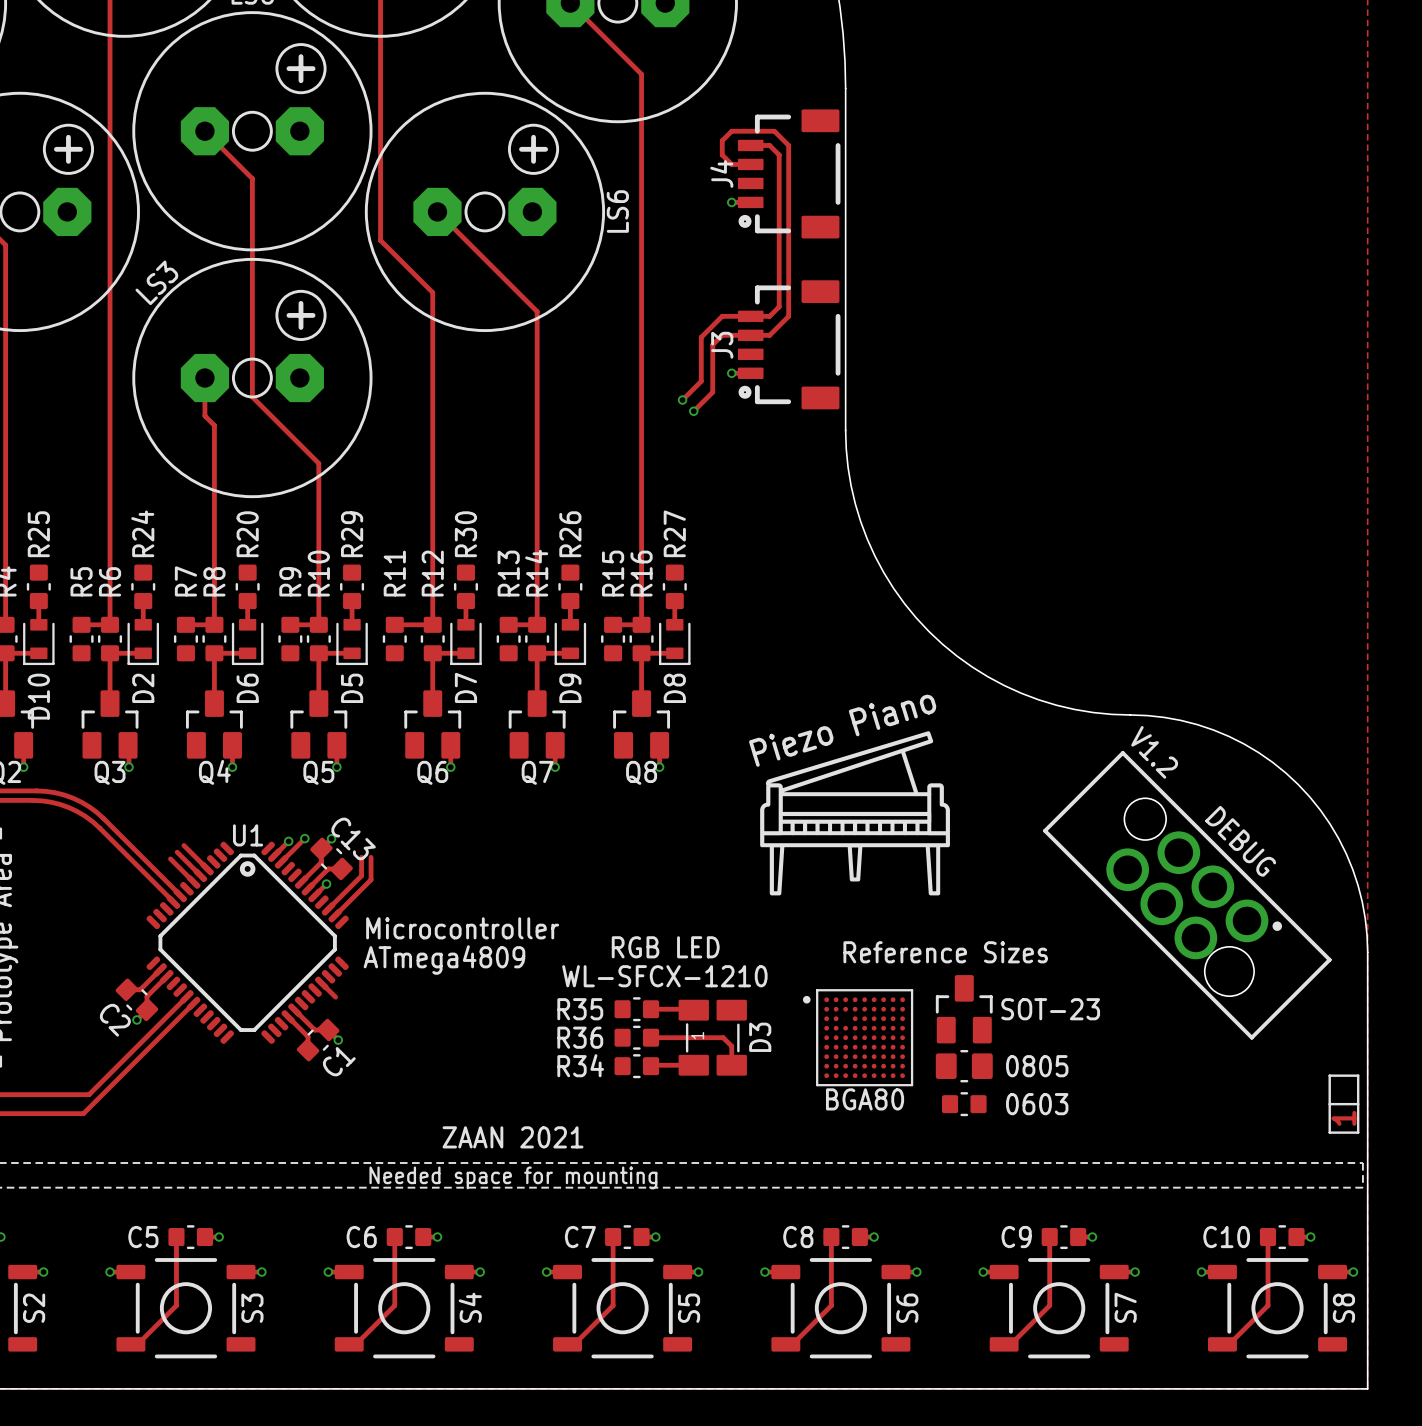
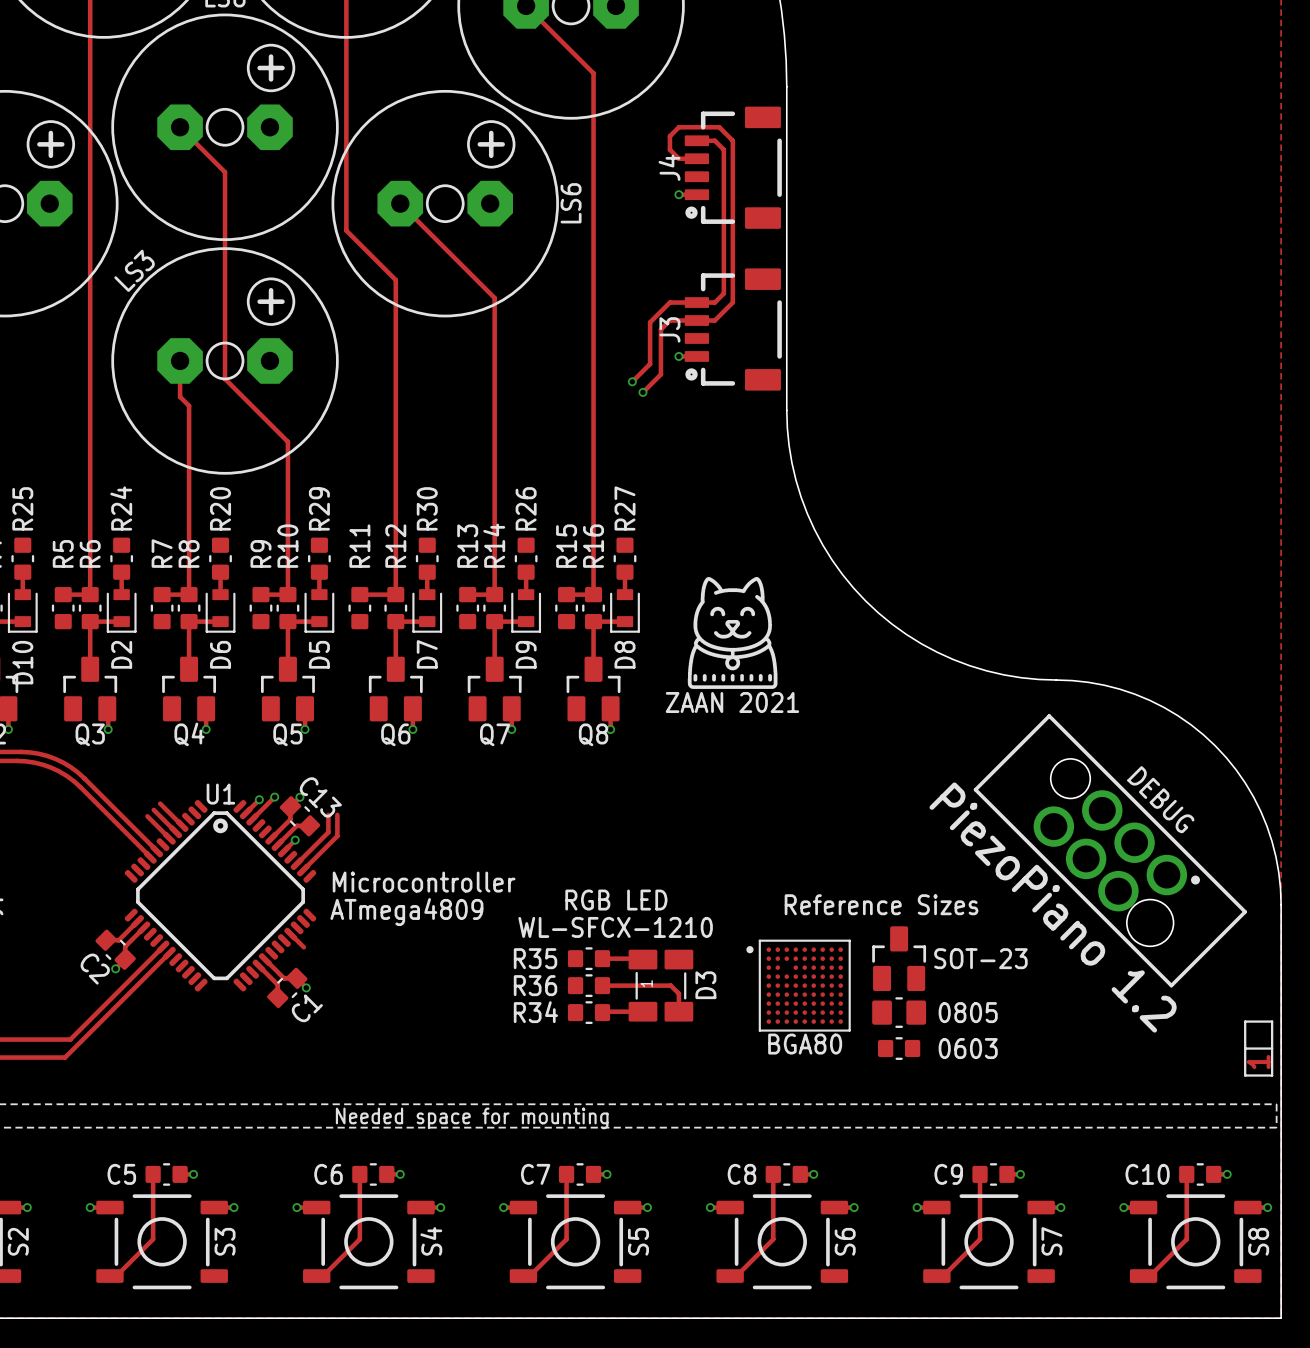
drawing: none -> [687, 577, 778, 689]
text: Piezo Piano (842, 730) -> none
drawing: [760, 731, 950, 896] -> none
text: none -> ZAAN 2021 (732, 702)
text: V1.2 (1154, 752) -> none
text: none -> PiezoPiano 1.2 (1053, 907)
text: ZAAN 2021 (513, 1137) -> none

